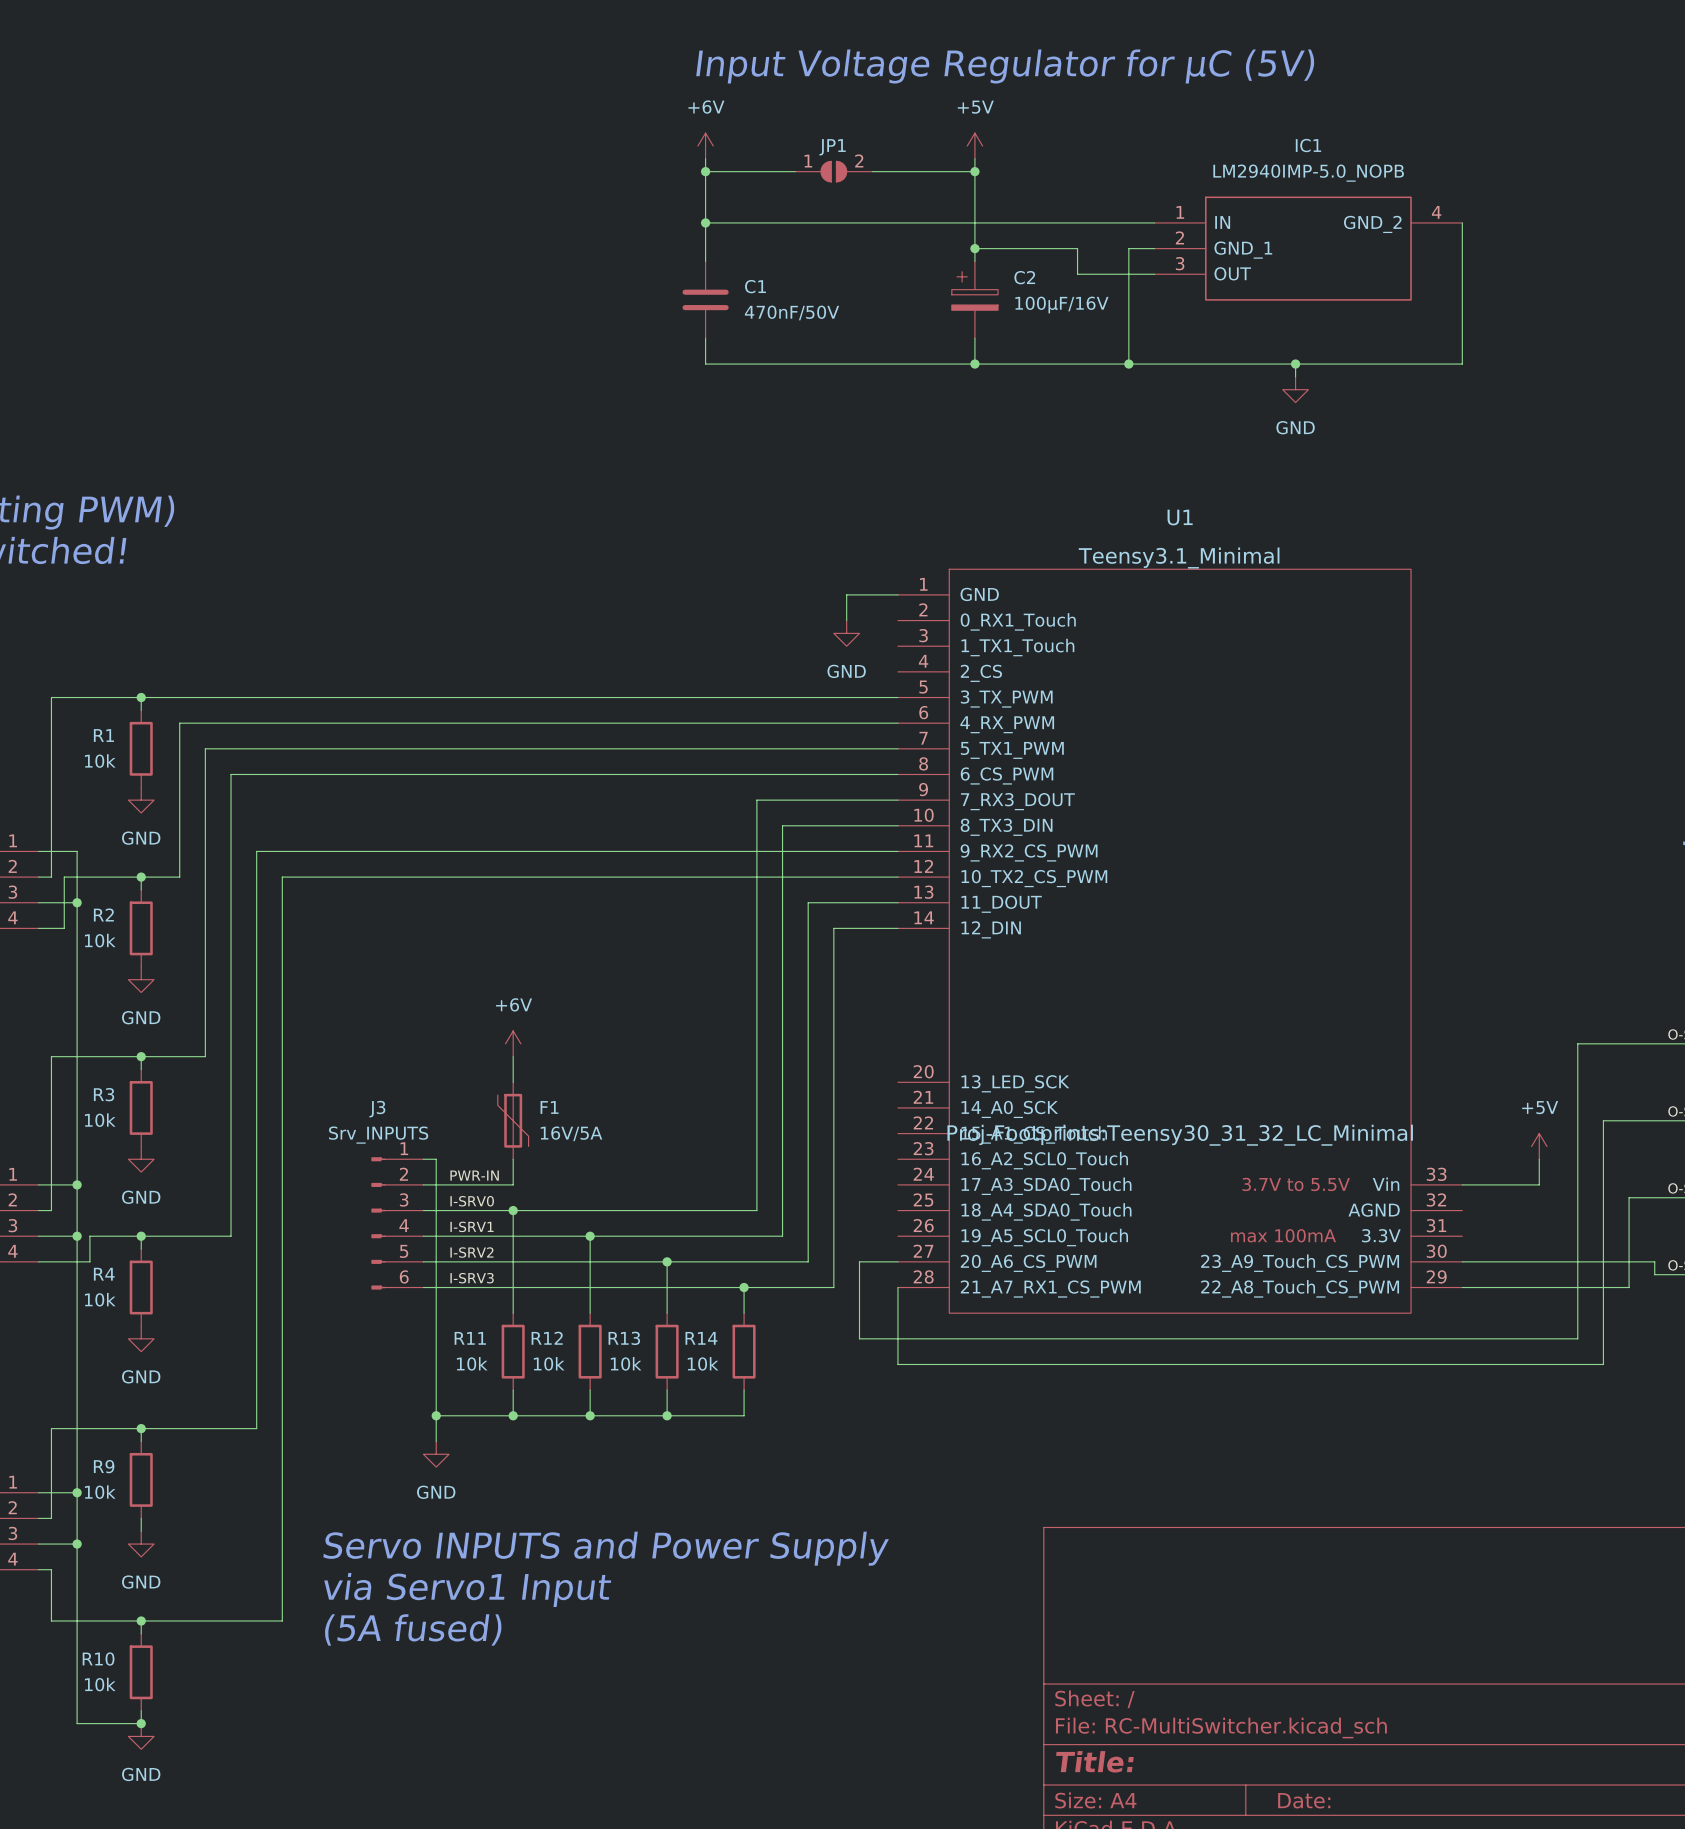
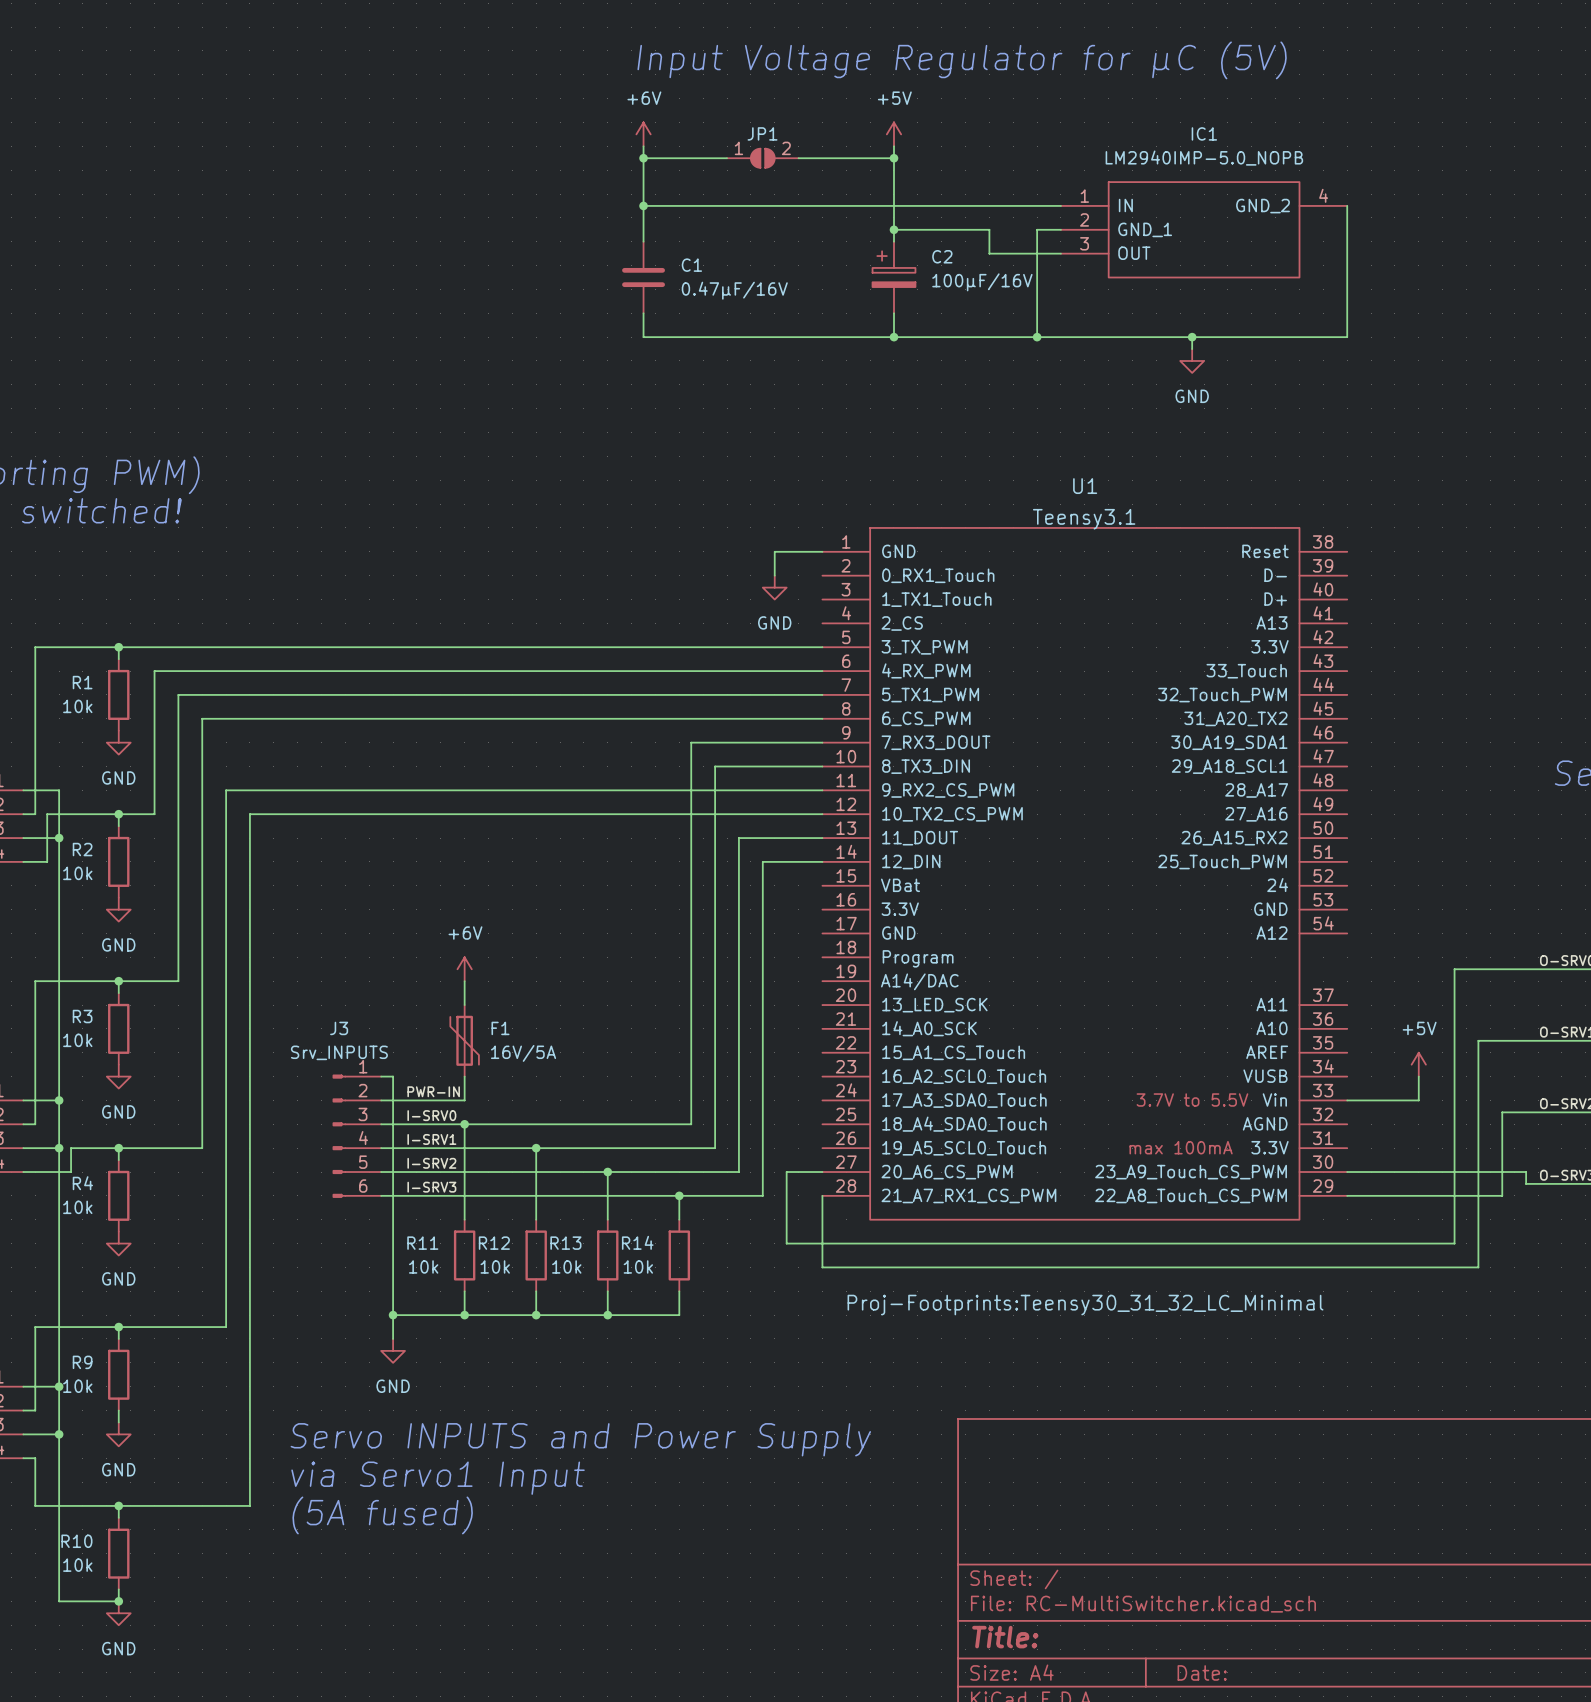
C1 value: 470nF/50V (792, 312) -> 0.47µF/16V (734, 290)
U1 value: Teensy3.1_Minimal (1179, 558) -> Teensy3.1 (1084, 519)
U1 symbol: [897, 569, 1463, 1314] -> [822, 527, 1348, 1220]
U1 text position: Proj-Footprints:Teensy30_31_32_LC_Minimal (1180, 1135) -> Proj-Footprints:Teensy30_31_32_LC_Minimal (1085, 1305)

